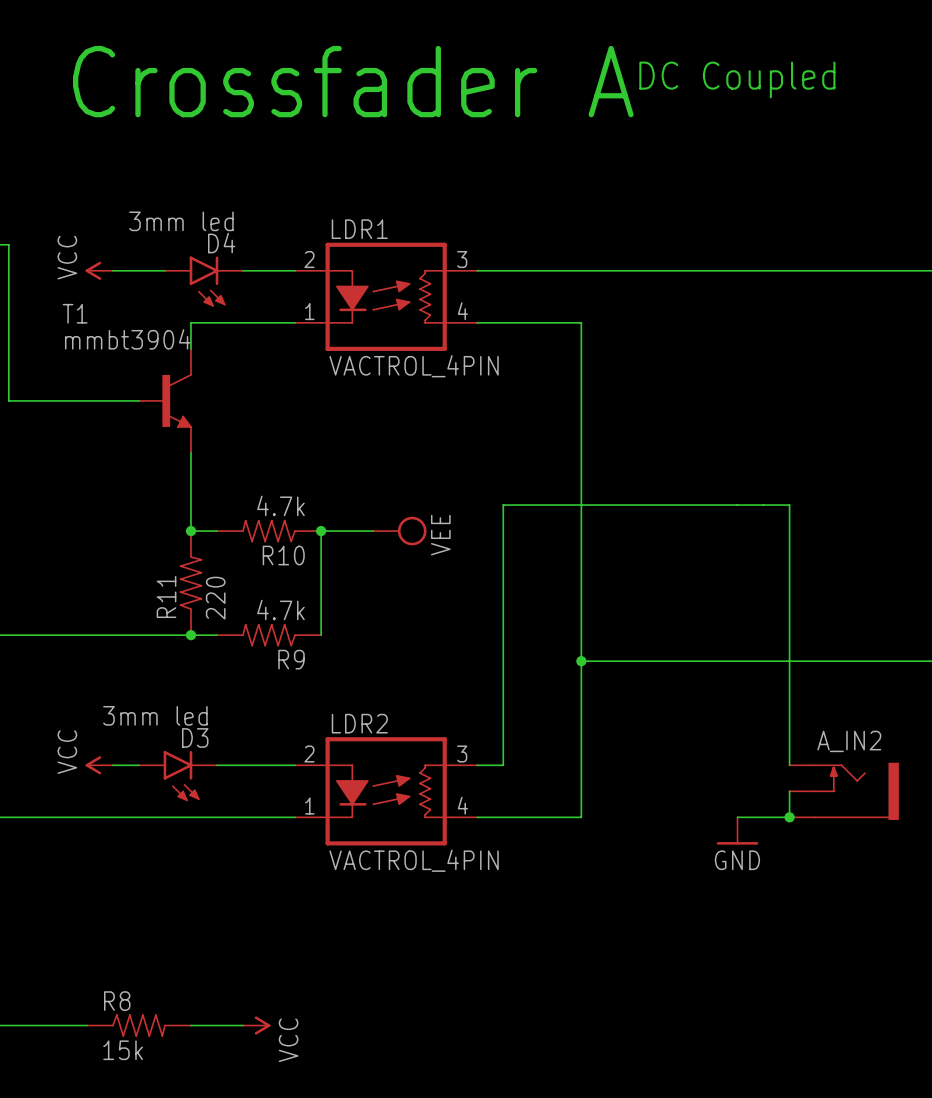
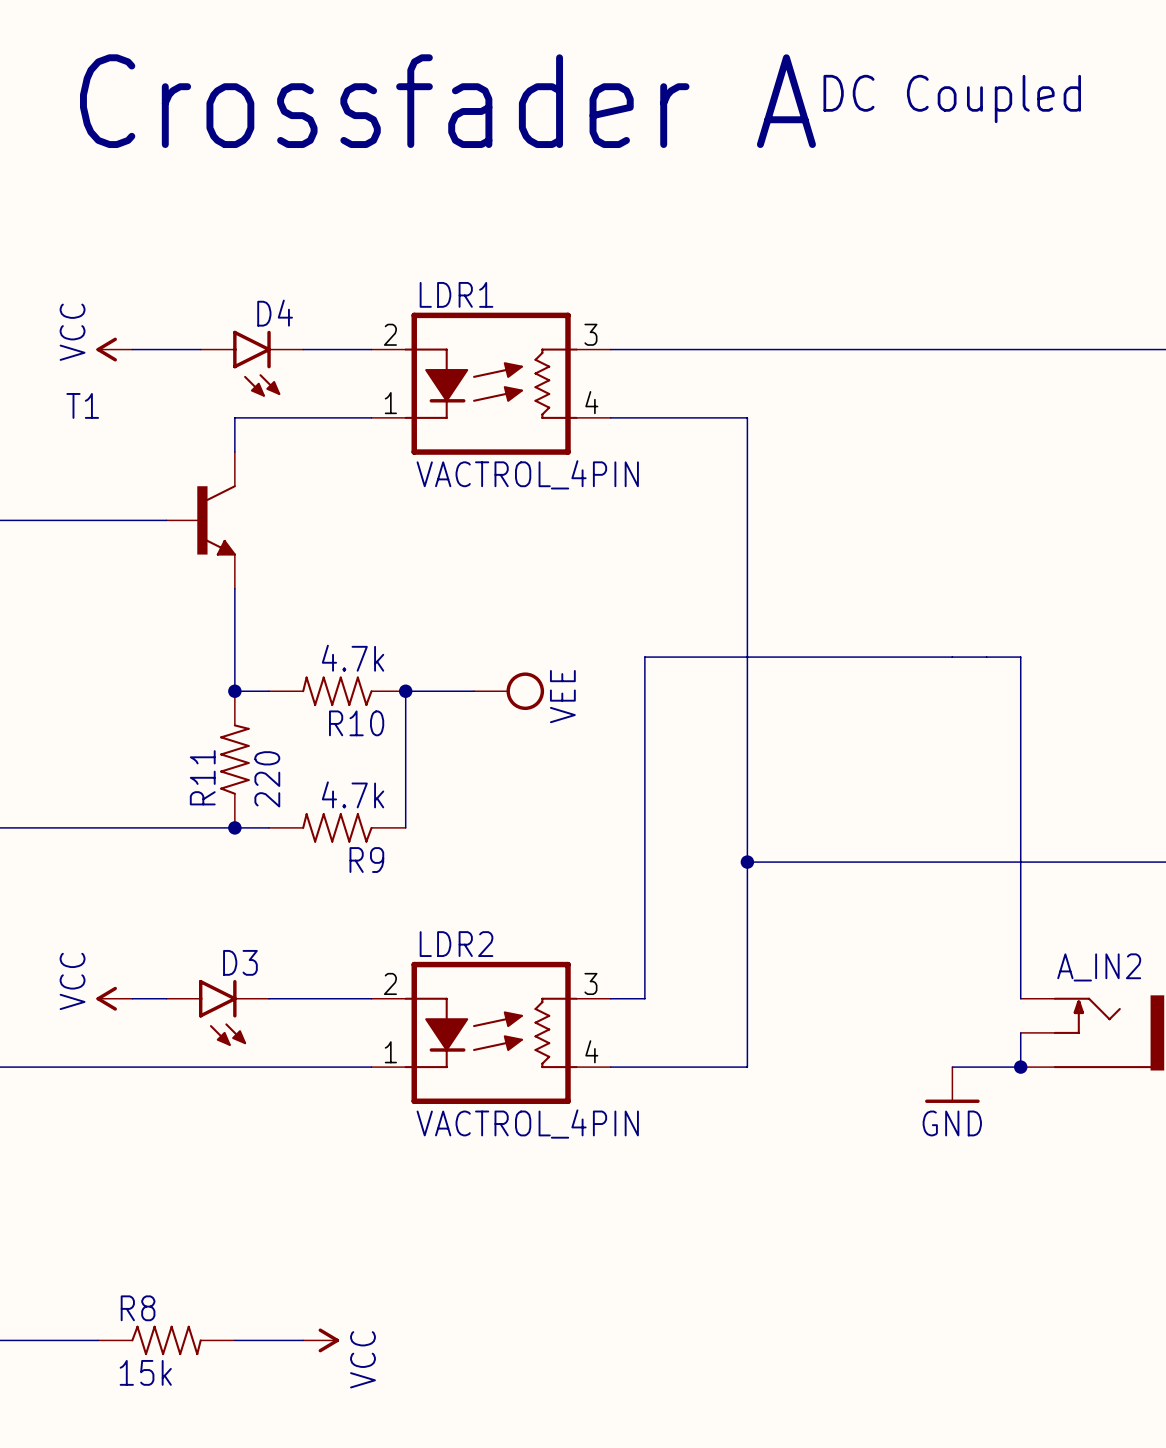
D4 value: 3mm led (181, 221) -> none
T1 value: mmbt3904 (127, 339) -> none
D3 value: 3mm led (155, 715) -> none

